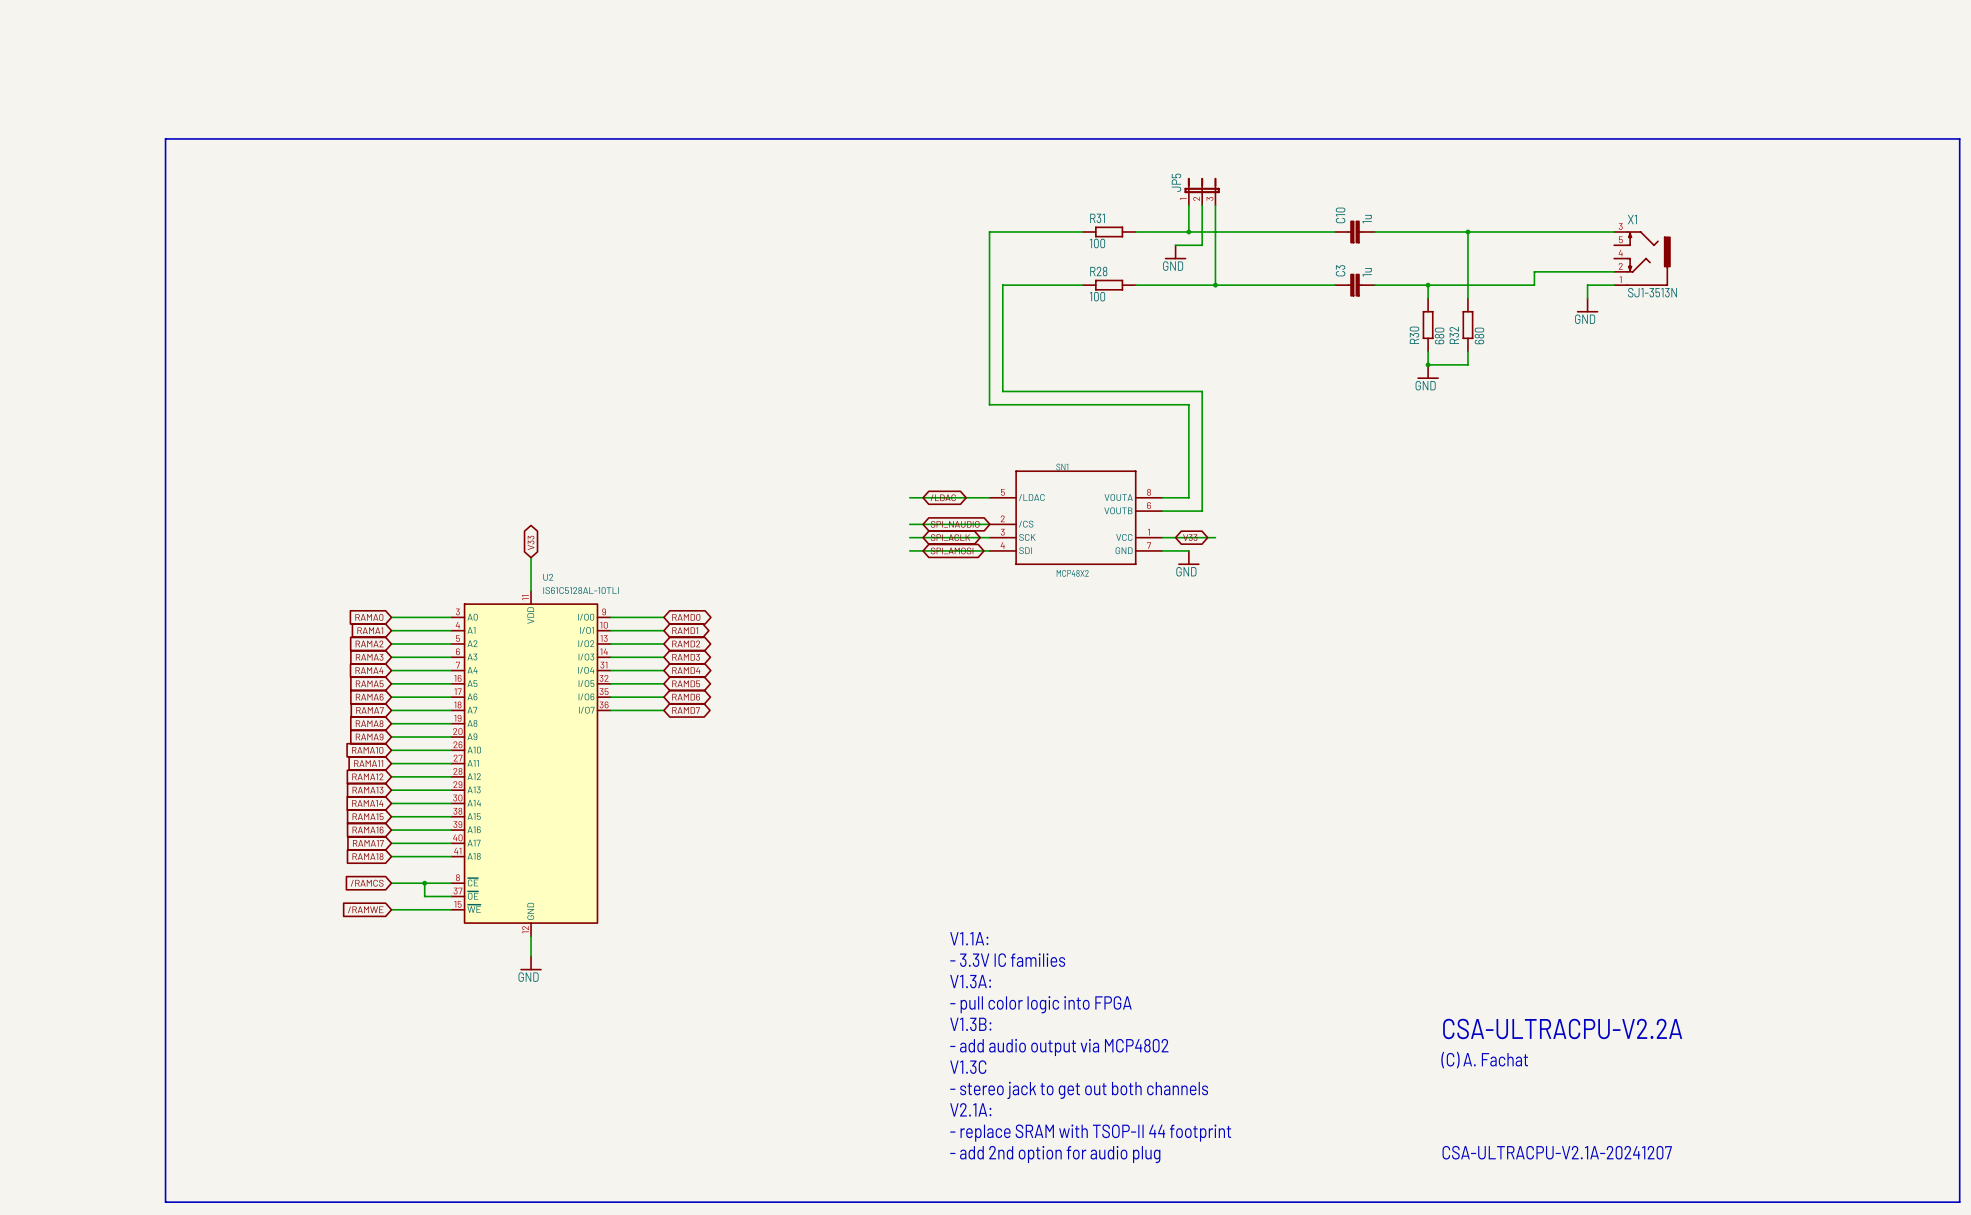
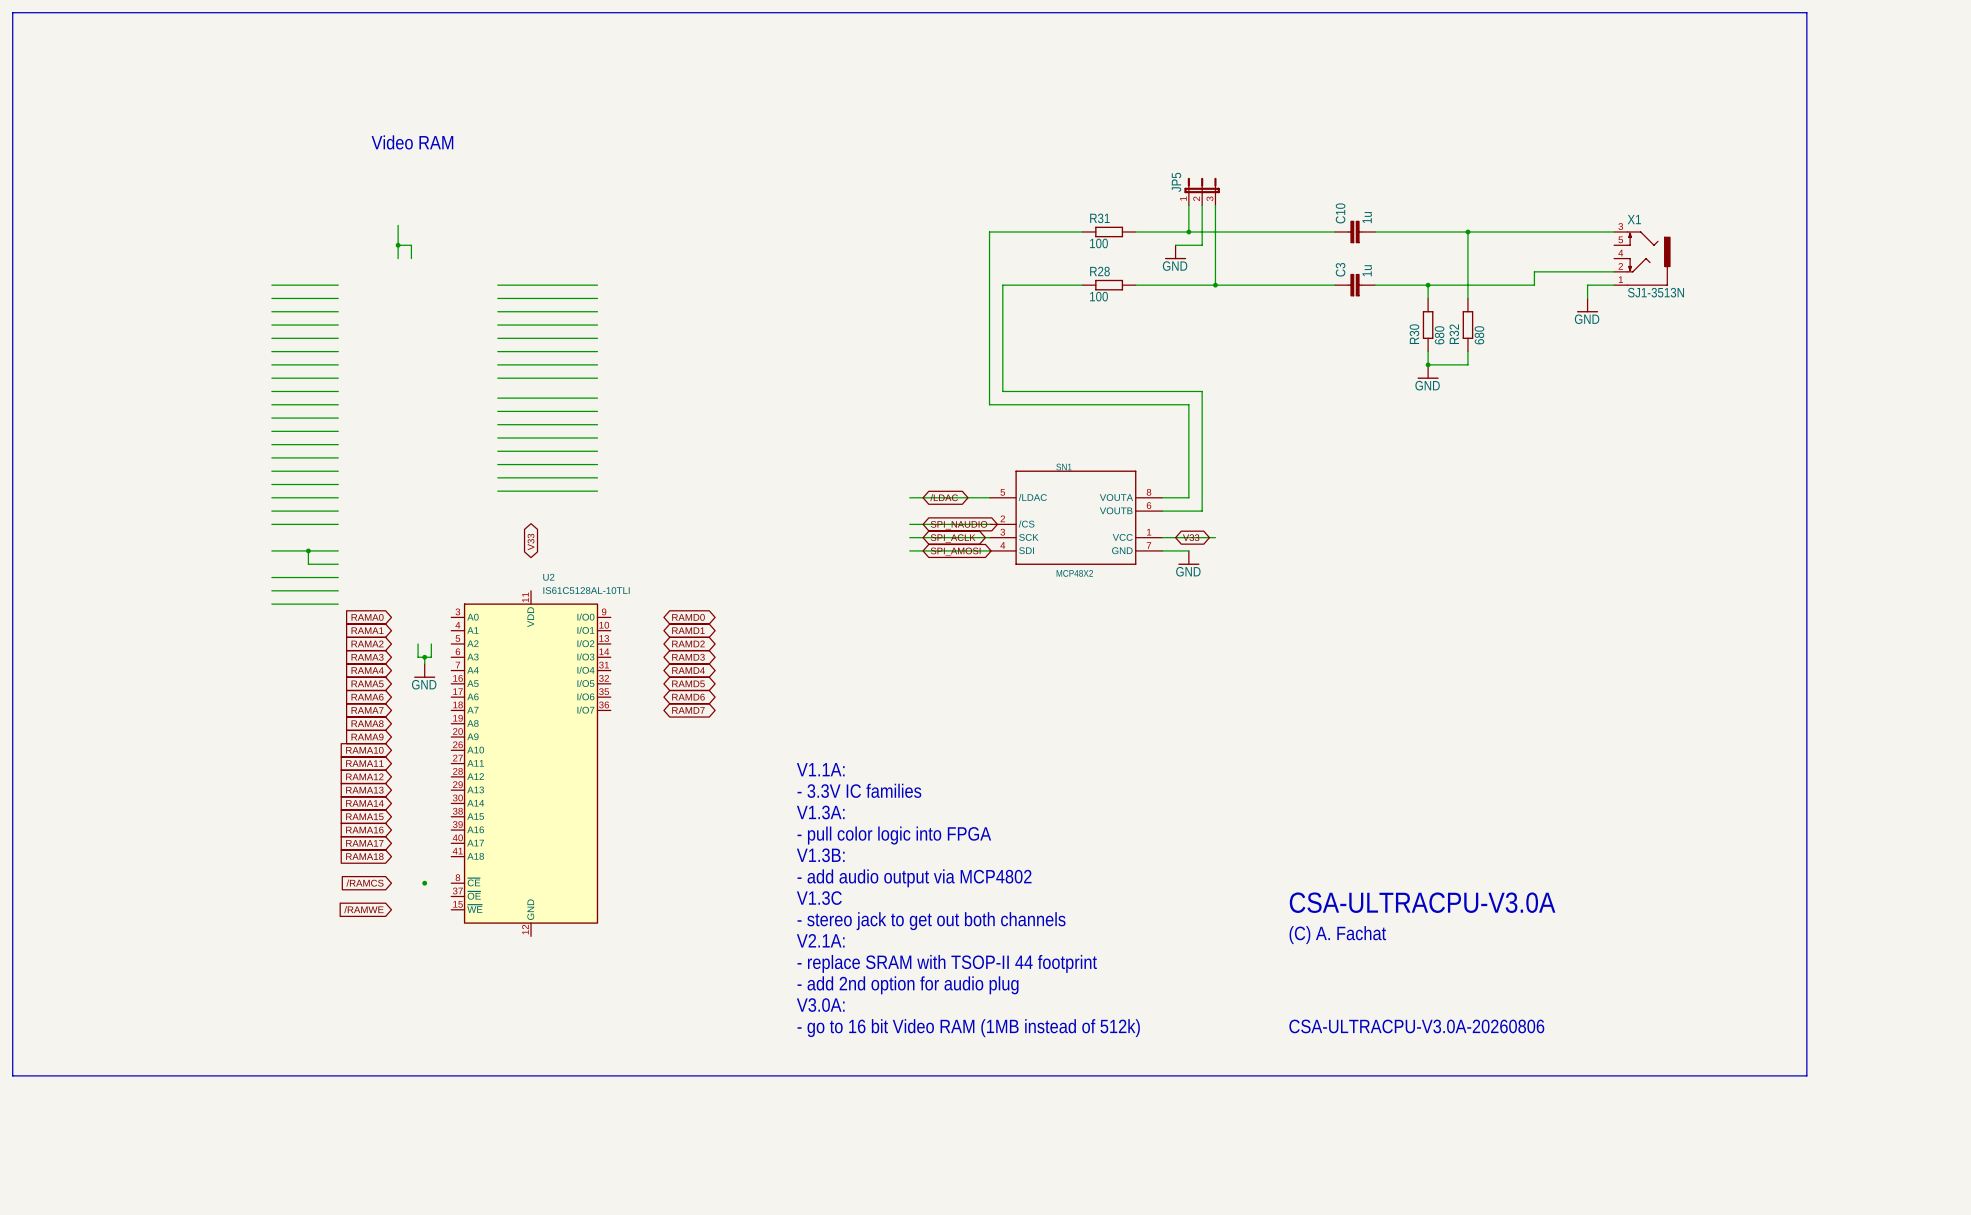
line: (165, 138) (165, 1202) (1959, 1202) (1959, 138) (165, 138) -> (12, 12) (12, 1075) (1806, 1075) (1806, 12) (12, 12)
text: none -> Video RAM (412, 142)
wire: none -> (398, 225) (398, 258)
wire: none -> (398, 245) (411, 245) (411, 258)
junction: none -> (398, 245)
wire: none -> (271, 285) (338, 285)
wire: none -> (497, 285) (597, 285)
wire: none -> (271, 298) (338, 298)
wire: none -> (497, 298) (597, 298)
wire: none -> (271, 311) (338, 311)
wire: none -> (497, 311) (597, 311)
wire: none -> (271, 325) (338, 325)
wire: none -> (497, 325) (597, 325)
wire: none -> (271, 338) (338, 338)
wire: none -> (497, 338) (597, 338)
wire: none -> (271, 351) (338, 351)
wire: none -> (497, 351) (597, 351)
wire: none -> (271, 364) (338, 364)
wire: none -> (497, 364) (597, 364)
wire: none -> (271, 378) (338, 378)
wire: none -> (497, 378) (597, 378)
wire: none -> (271, 391) (338, 391)
wire: none -> (497, 398) (597, 398)
wire: none -> (271, 404) (338, 404)
wire: none -> (497, 411) (597, 411)
wire: none -> (271, 418) (338, 418)
wire: none -> (497, 424) (597, 424)
wire: none -> (271, 431) (338, 431)
wire: none -> (497, 437) (597, 437)
wire: none -> (271, 444) (338, 444)
wire: none -> (497, 451) (597, 451)
wire: none -> (271, 457) (338, 457)
wire: none -> (497, 464) (597, 464)
wire: none -> (271, 471) (338, 471)
wire: none -> (497, 477) (597, 477)
wire: none -> (271, 484) (338, 484)
wire: none -> (497, 491) (597, 491)
wire: none -> (271, 497) (338, 497)
wire: none -> (271, 511) (338, 511)
wire: none -> (271, 524) (338, 524)
wire: none -> (271, 550) (338, 550)
wire: none -> (308, 550) (308, 564) (338, 564)
junction: none -> (308, 550)
wire: (531, 557) (531, 590) -> none
wire: none -> (271, 577) (338, 577)
wire: none -> (271, 590) (338, 590)
wire: none -> (271, 604) (338, 604)
wire: (391, 617) (451, 617) -> none
wire: (610, 617) (663, 617) -> none
wire: (391, 630) (451, 630) -> none
wire: (610, 630) (663, 630) -> none
wire: (391, 643) (451, 643) -> none
wire: (610, 643) (663, 643) -> none
wire: (391, 657) (418, 657) -> (418, 643) (418, 657)
wire: none -> (424, 657) (424, 663)
junction: none -> (424, 657)
wire: (431, 657) (451, 657) -> (431, 657) (431, 643)
wire: (610, 657) (663, 657) -> none
wire: (391, 670) (451, 670) -> none
power symbol: none -> GND (424, 670)
wire: (610, 670) (663, 670) -> none
wire: (391, 683) (451, 683) -> none
wire: (610, 683) (663, 683) -> none
wire: (391, 697) (451, 697) -> none
wire: (610, 697) (663, 697) -> none
wire: (391, 710) (451, 710) -> none
wire: (610, 710) (663, 710) -> none
wire: (391, 723) (451, 723) -> none
wire: (391, 737) (451, 737) -> none
wire: (391, 750) (451, 750) -> none
wire: (391, 763) (451, 763) -> none
text: none -> V1.1A: (820, 769)
wire: (391, 776) (451, 776) -> none
wire: (391, 790) (451, 790) -> none
text: none -> - 3.3V IC families (859, 790)
wire: (391, 803) (451, 803) -> none
text: none -> V1.3A: (820, 812)
wire: (391, 816) (451, 816) -> none
wire: (391, 830) (451, 830) -> none
text: none -> - pull color logic into FPGA (894, 835)
wire: (391, 843) (451, 843) -> none
text: none -> V1.3B: (820, 855)
wire: (391, 856) (451, 856) -> none
text: none -> - add audio output via MCP4802 (914, 878)
wire: (391, 883) (451, 883) -> none
wire: (424, 883) (424, 896) (451, 896) -> none
text: none -> V1.3C (819, 898)
text: none -> CSA-ULTRACPU-V3.0A (1422, 902)
wire: (391, 909) (451, 909) -> none
text: none -> - stereo jack to get out both channels (931, 921)
text: none -> (C) A. Fachat (1337, 935)
wire: (531, 936) (531, 956) -> none
text: V1.1A: (969, 938) -> none
text: none -> V2.1A: (820, 940)
text: - 3.3V IC families (1007, 960) -> none
power symbol: GND (531, 963) -> none
text: none -> - replace SRAM with TSOP-II 44 footprint (947, 963)
text: V1.3A: (970, 981) -> none
text: none -> - add 2nd option for audio plug (908, 985)
text: - pull color logic into FPGA (1040, 1004) -> none
text: none -> V3.0A: (820, 1005)
text: V1.3B: (970, 1024) -> none
text: none -> CSA-ULTRACPU-V3.0A-20260806 (1416, 1026)
text: none -> - go to 16 bit Video RAM (1MB instead of 512k) (968, 1028)
text: CSA-ULTRACPU-V2.2A (1562, 1028) -> none
text: - add audio output via MCP4802 (1059, 1047) -> none
text: (C) A. Fachat (1484, 1060) -> none
text: V1.3C (968, 1067) -> none
text: - stereo jack to get out both channels (1079, 1090) -> none
text: V2.1A: (970, 1109) -> none
text: - replace SRAM with TSOP-II 44 footprint (1090, 1133) -> none
text: CSA-ULTRACPU-V2.1A-20241207 (1557, 1152) -> none
text: - add 2nd option for audio plug (1055, 1154) -> none

